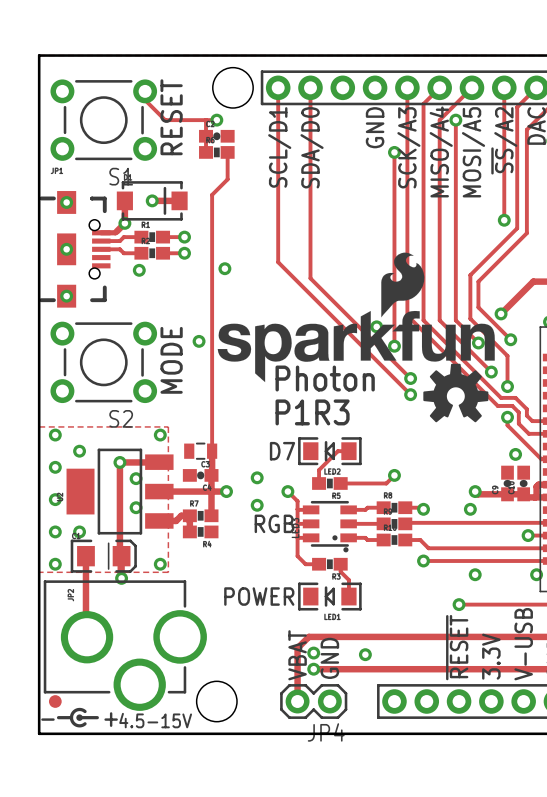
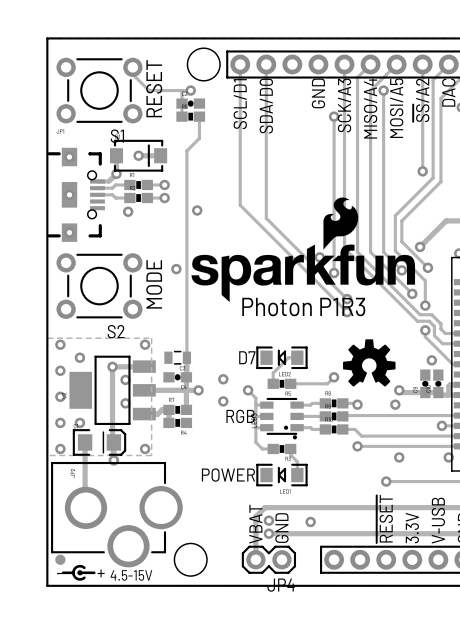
text: Photon (325, 378) -> Photon P1R3 (303, 307)
drawing position: (455, 393) -> (369, 362)
text: P1R3 (312, 412) -> none

